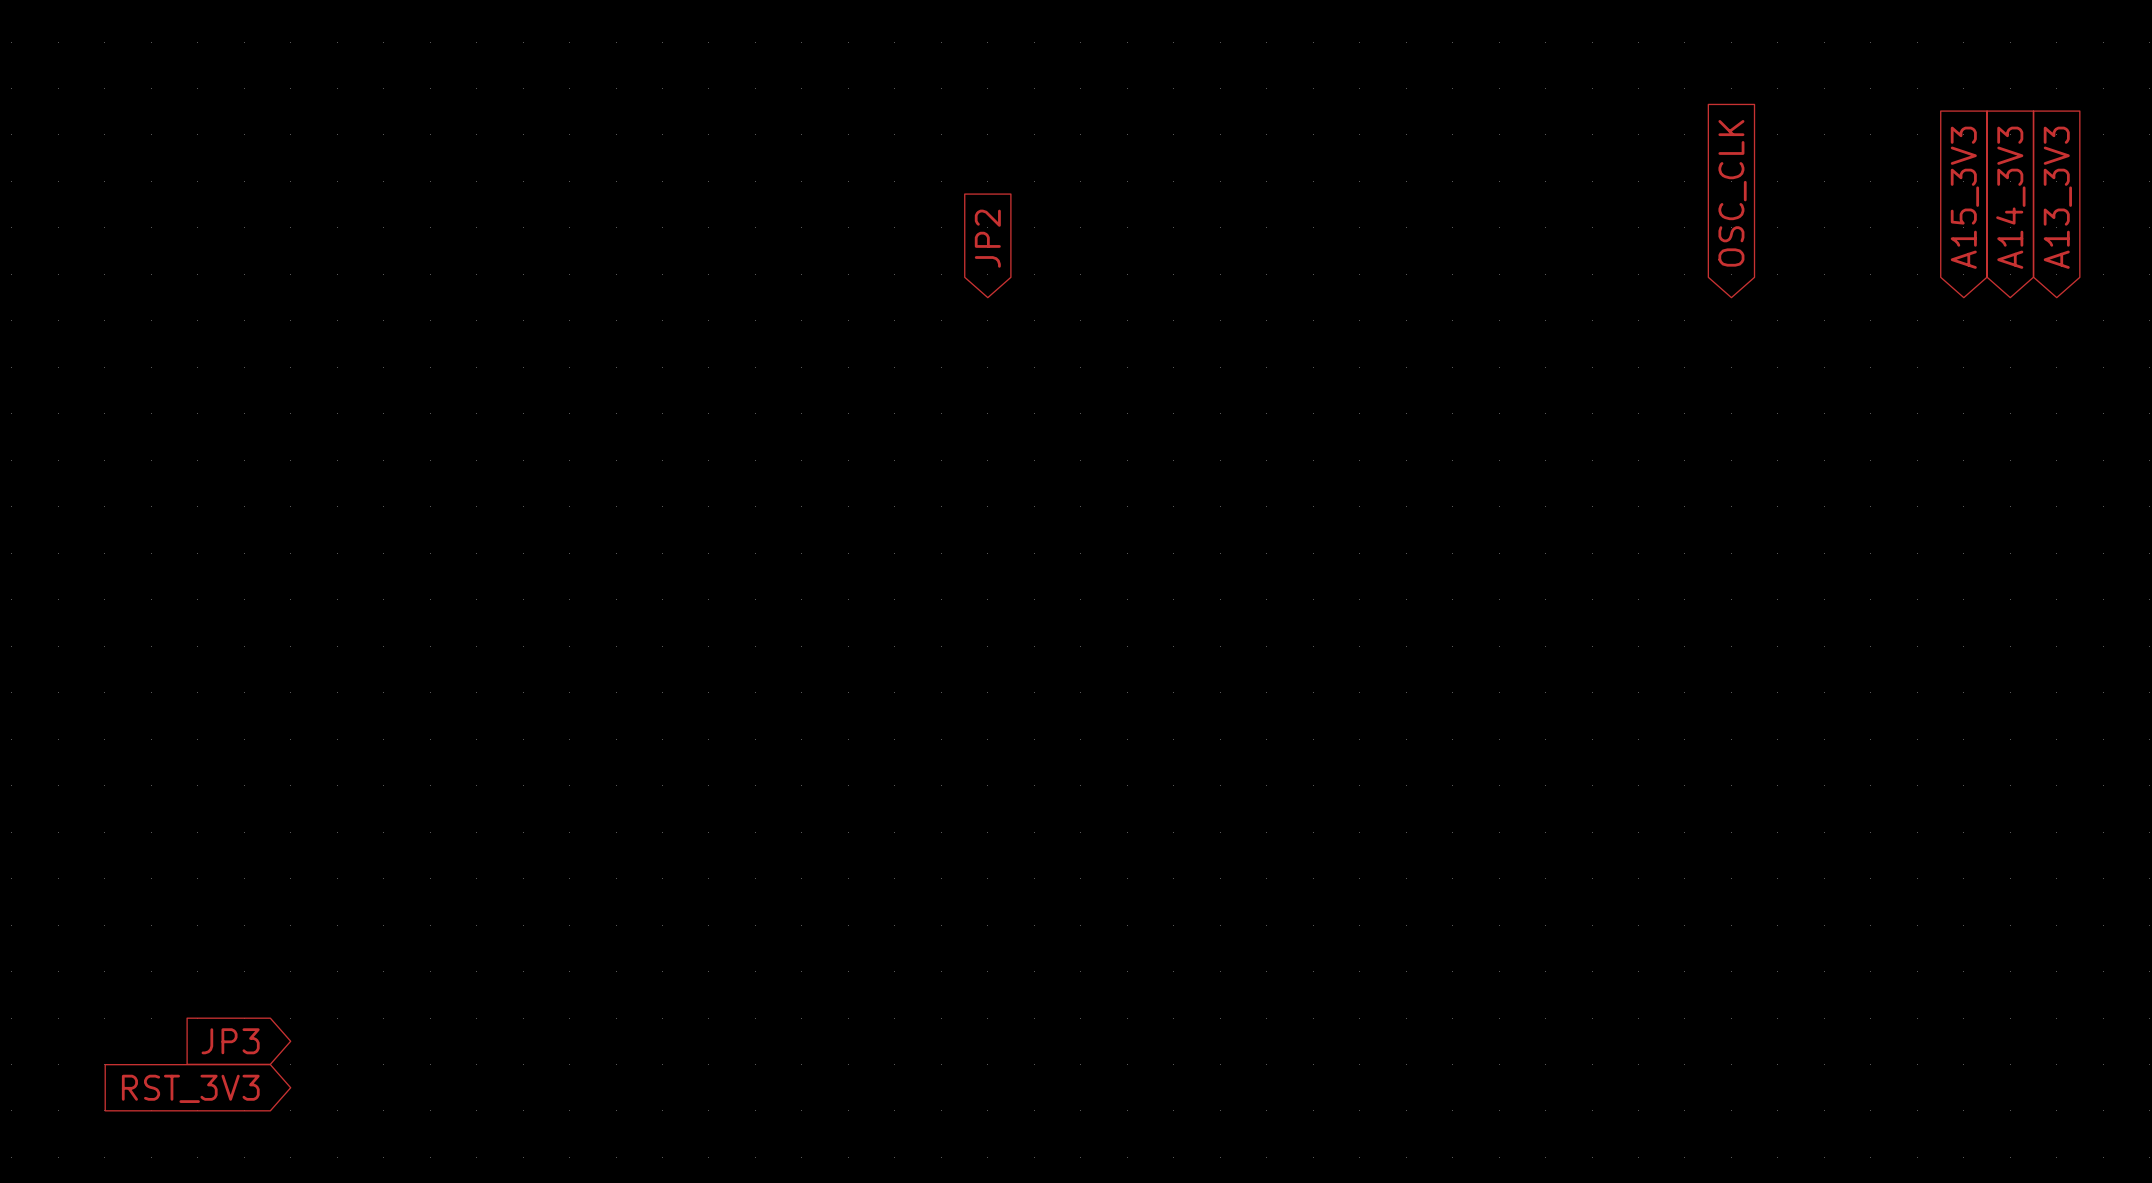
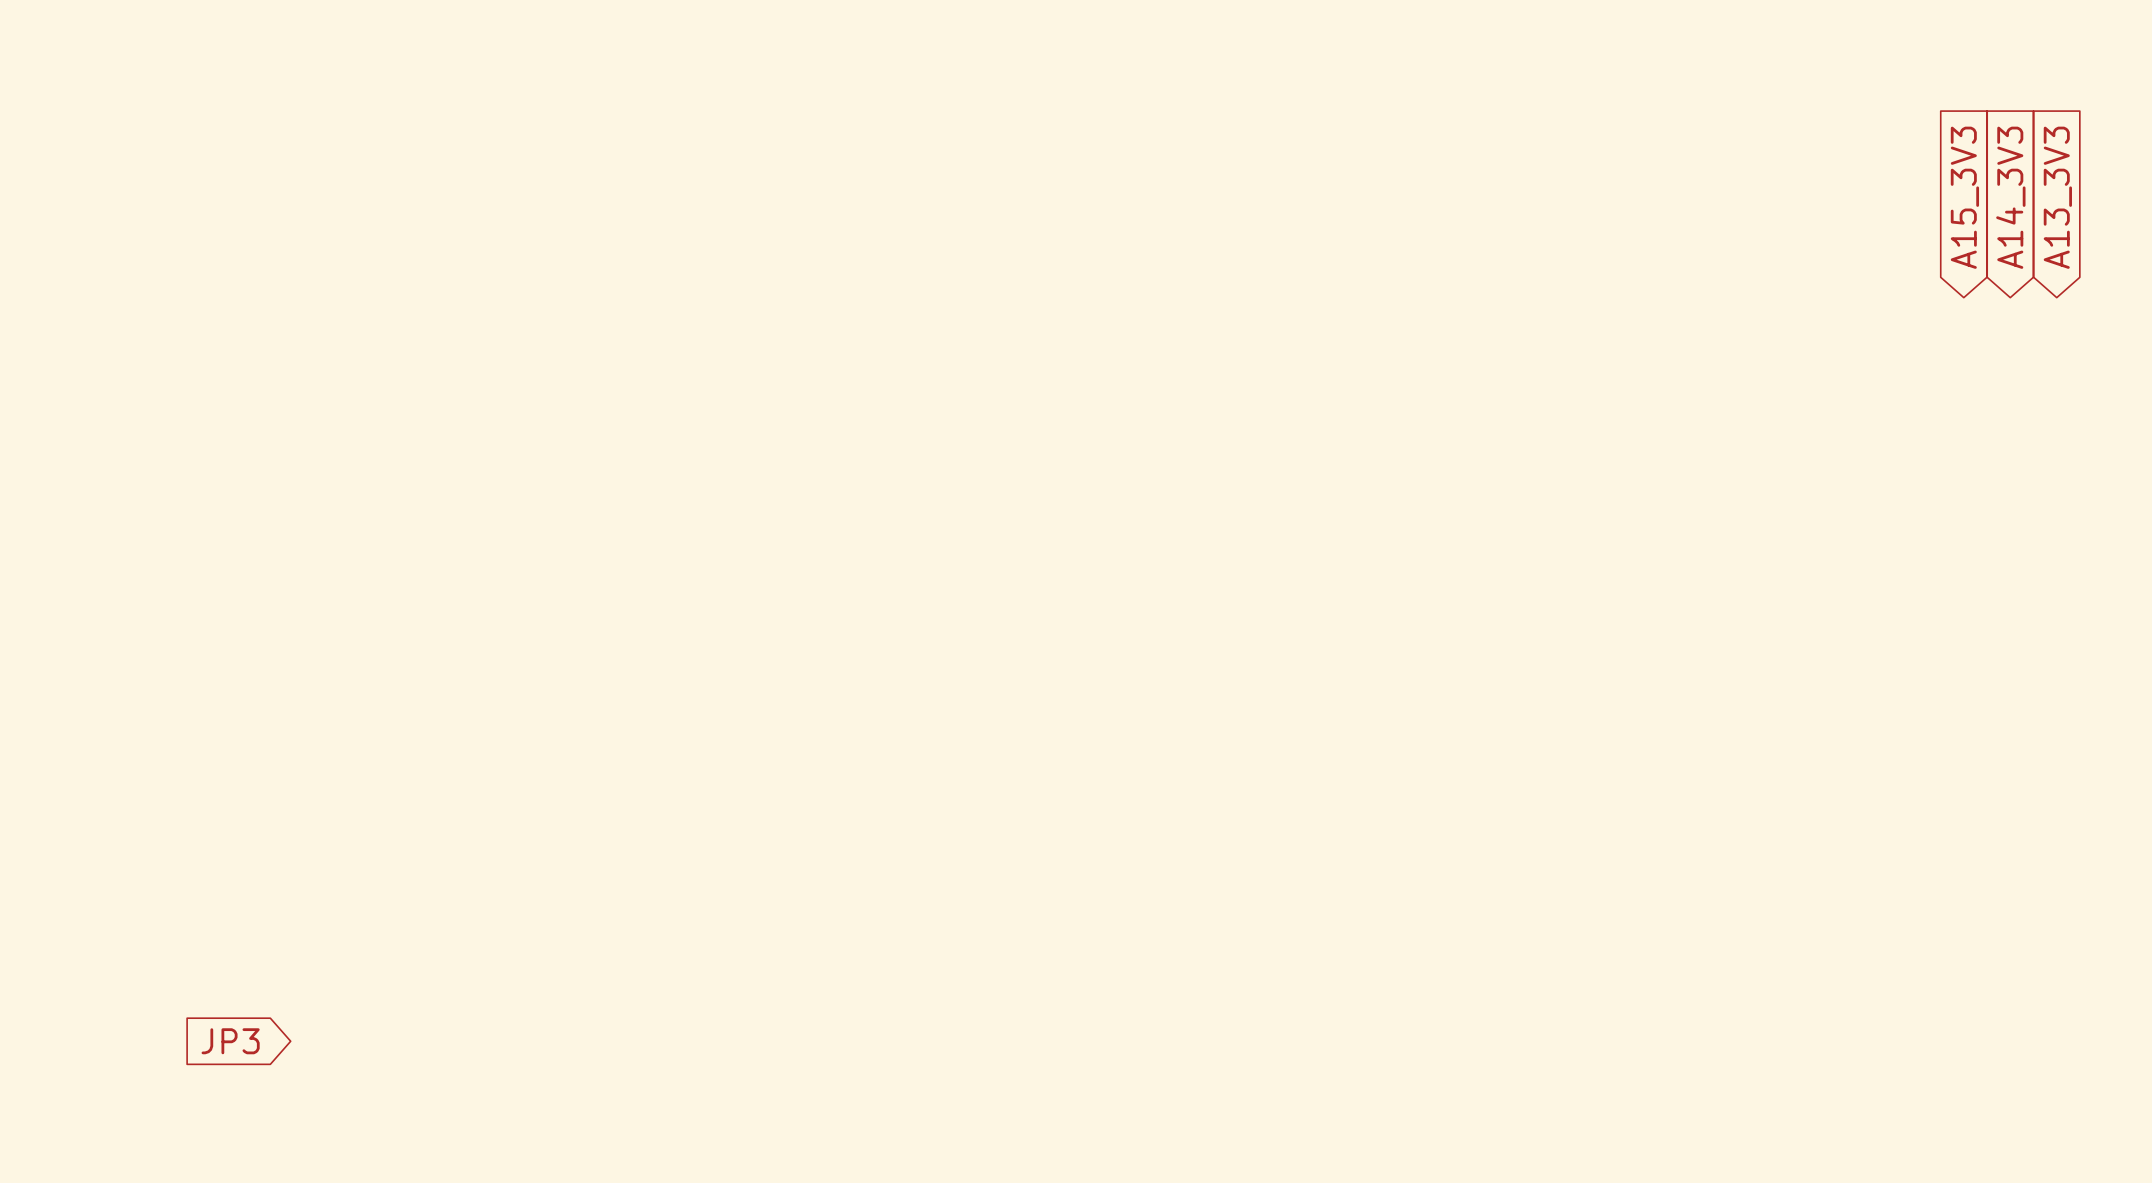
global label: OSC_CLK (1732, 193) -> none
global label: JP2 (987, 238) -> none
global label: RST_3V3 (190, 1088) -> none

